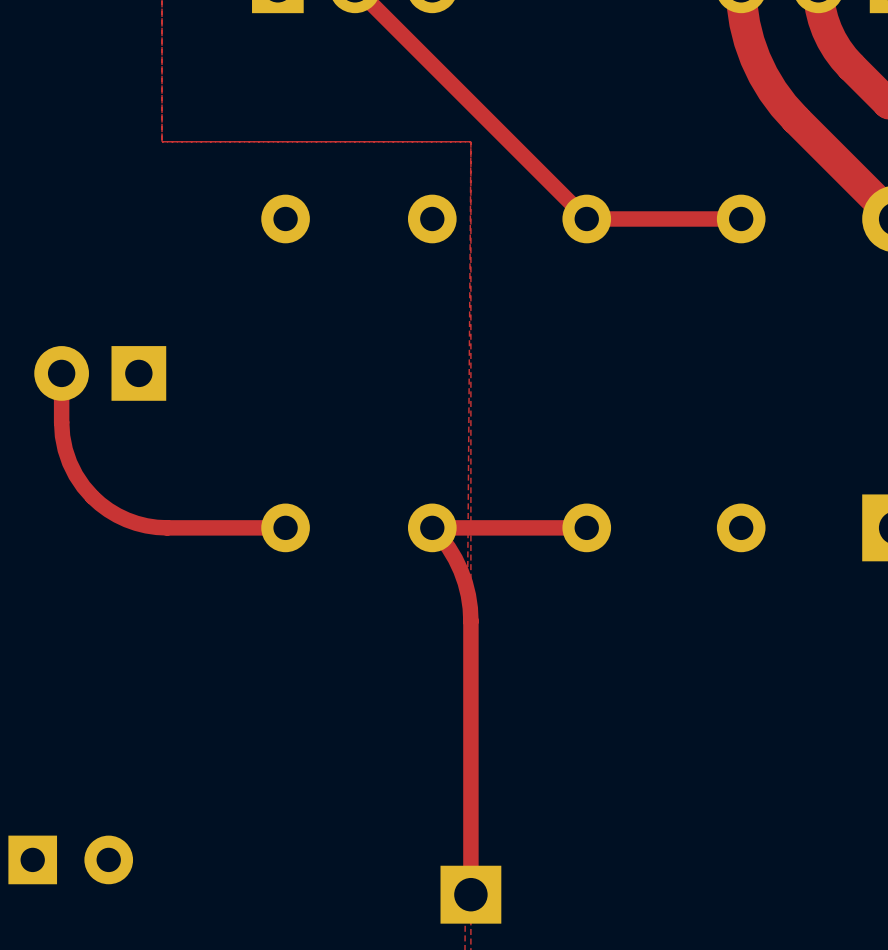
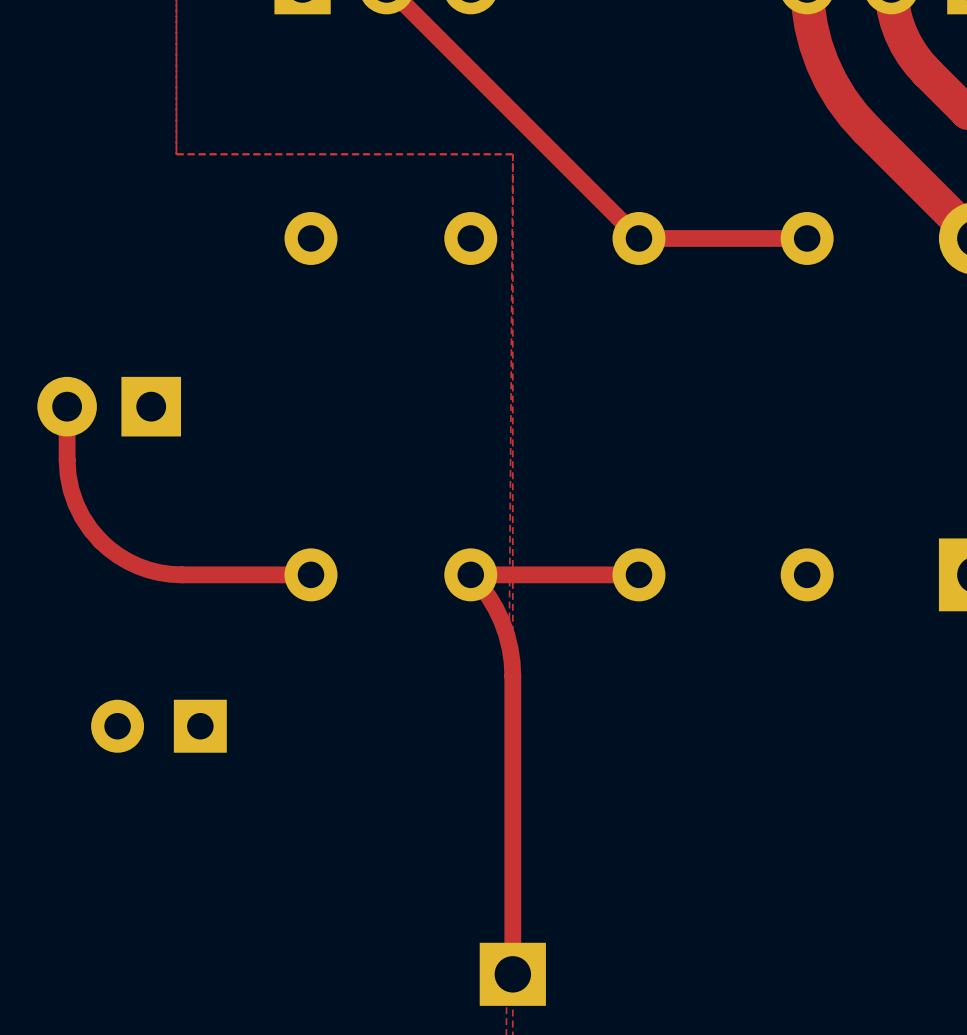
part rotation: 0° (70, 859) -> 180° (158, 726)
part position: (70, 859) -> (158, 726)

